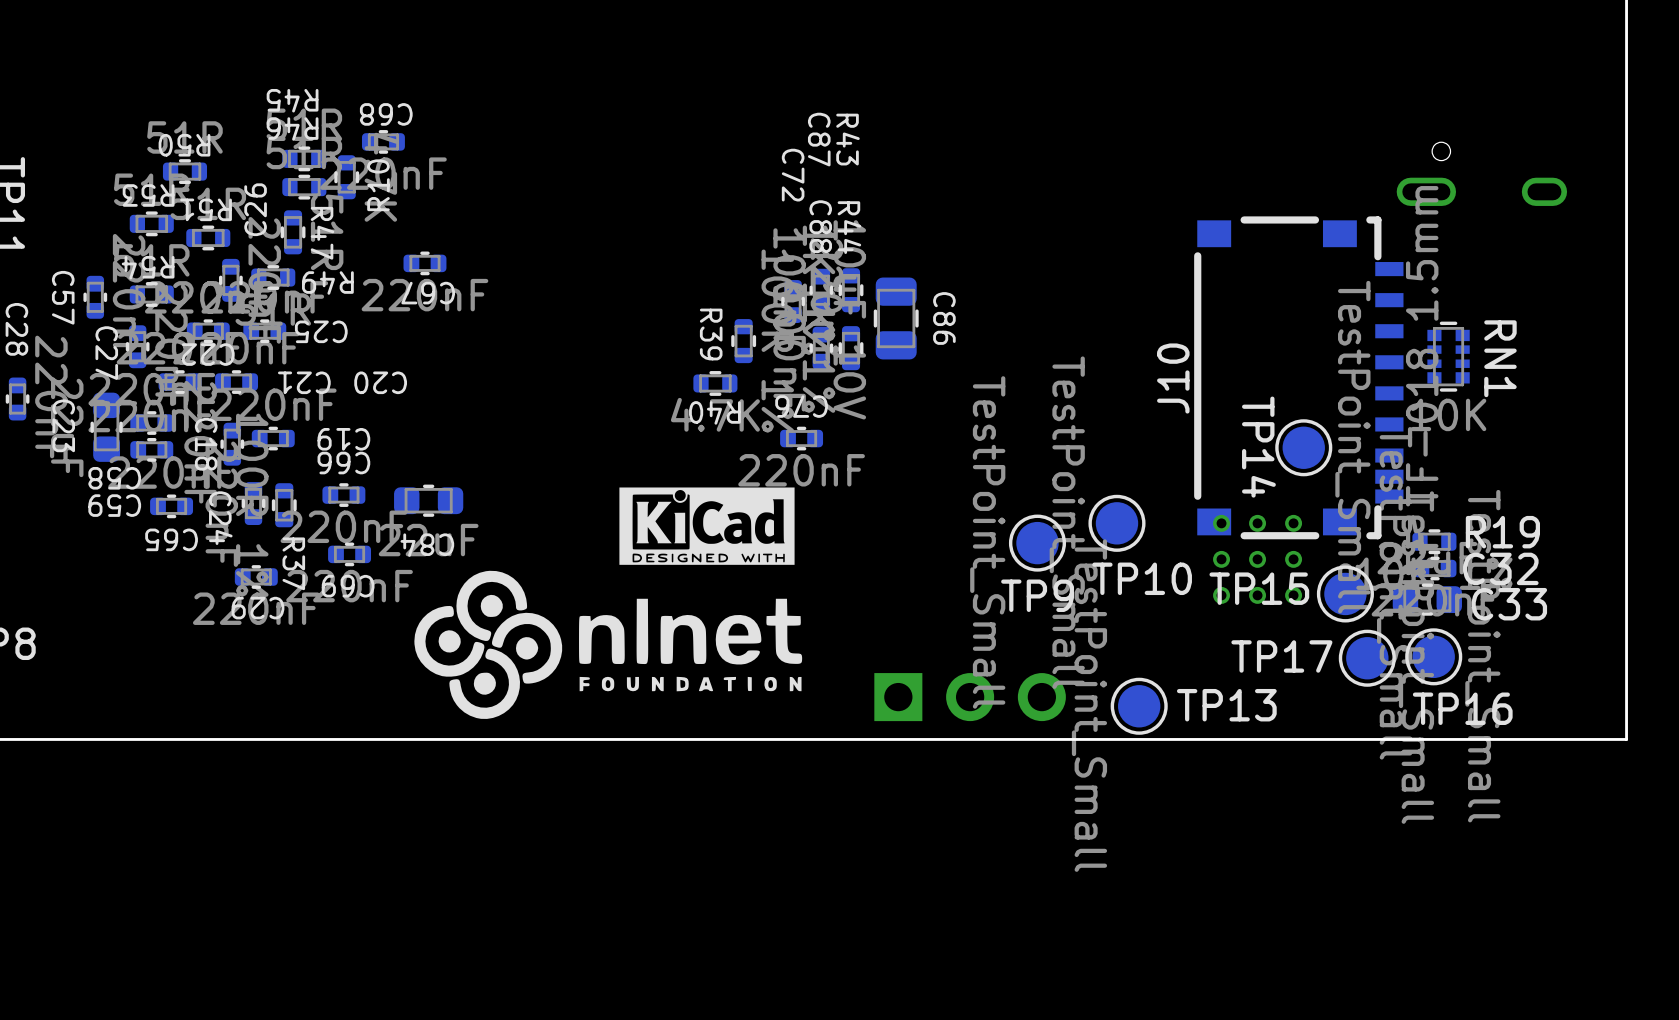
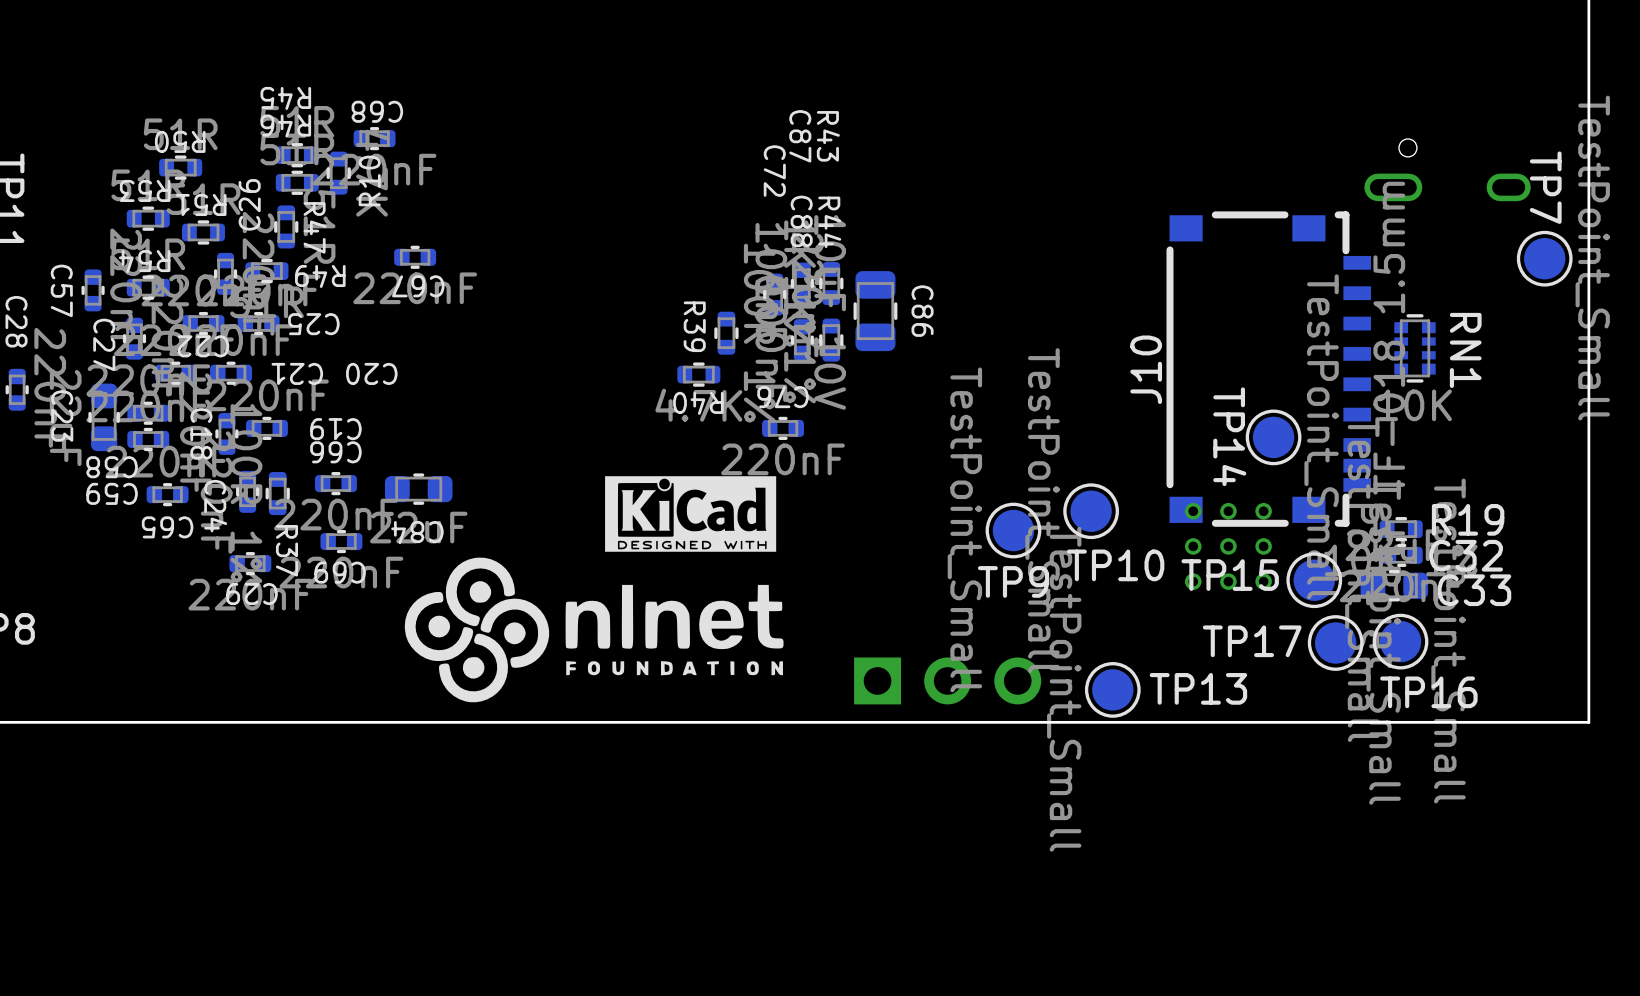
TP7: none -> TestPoint_Small (1544, 258)

